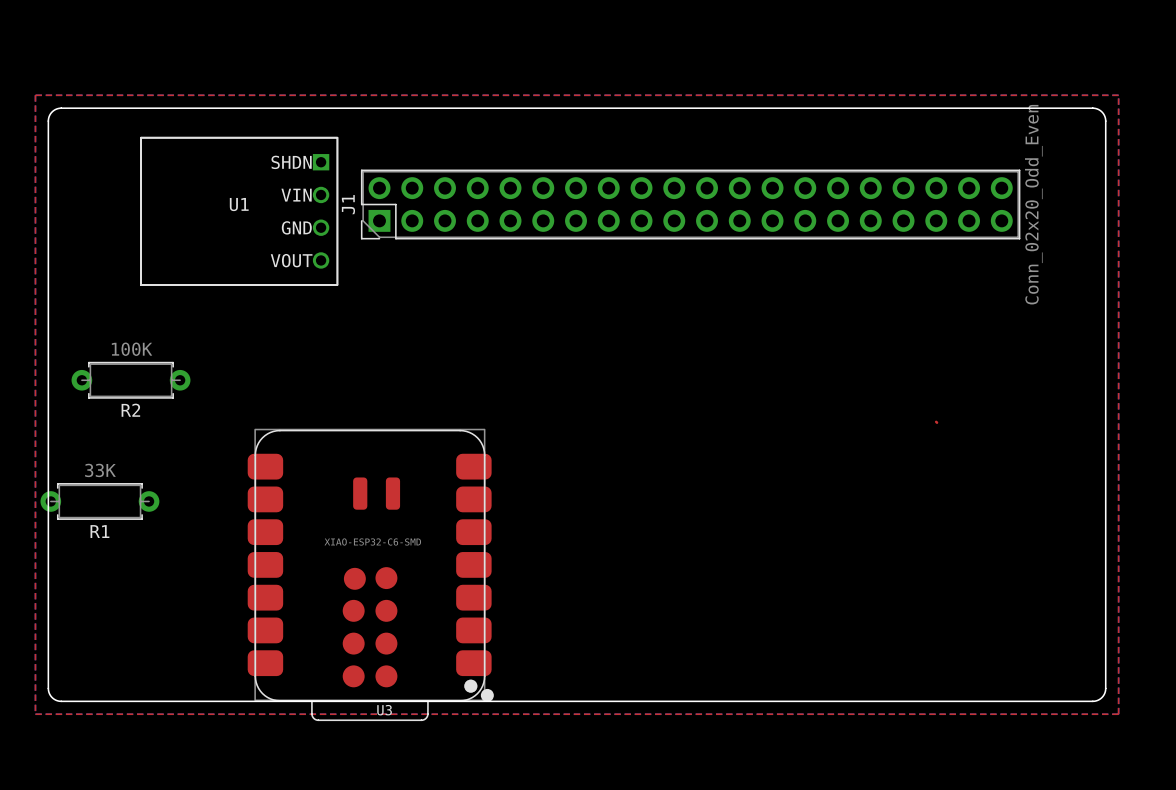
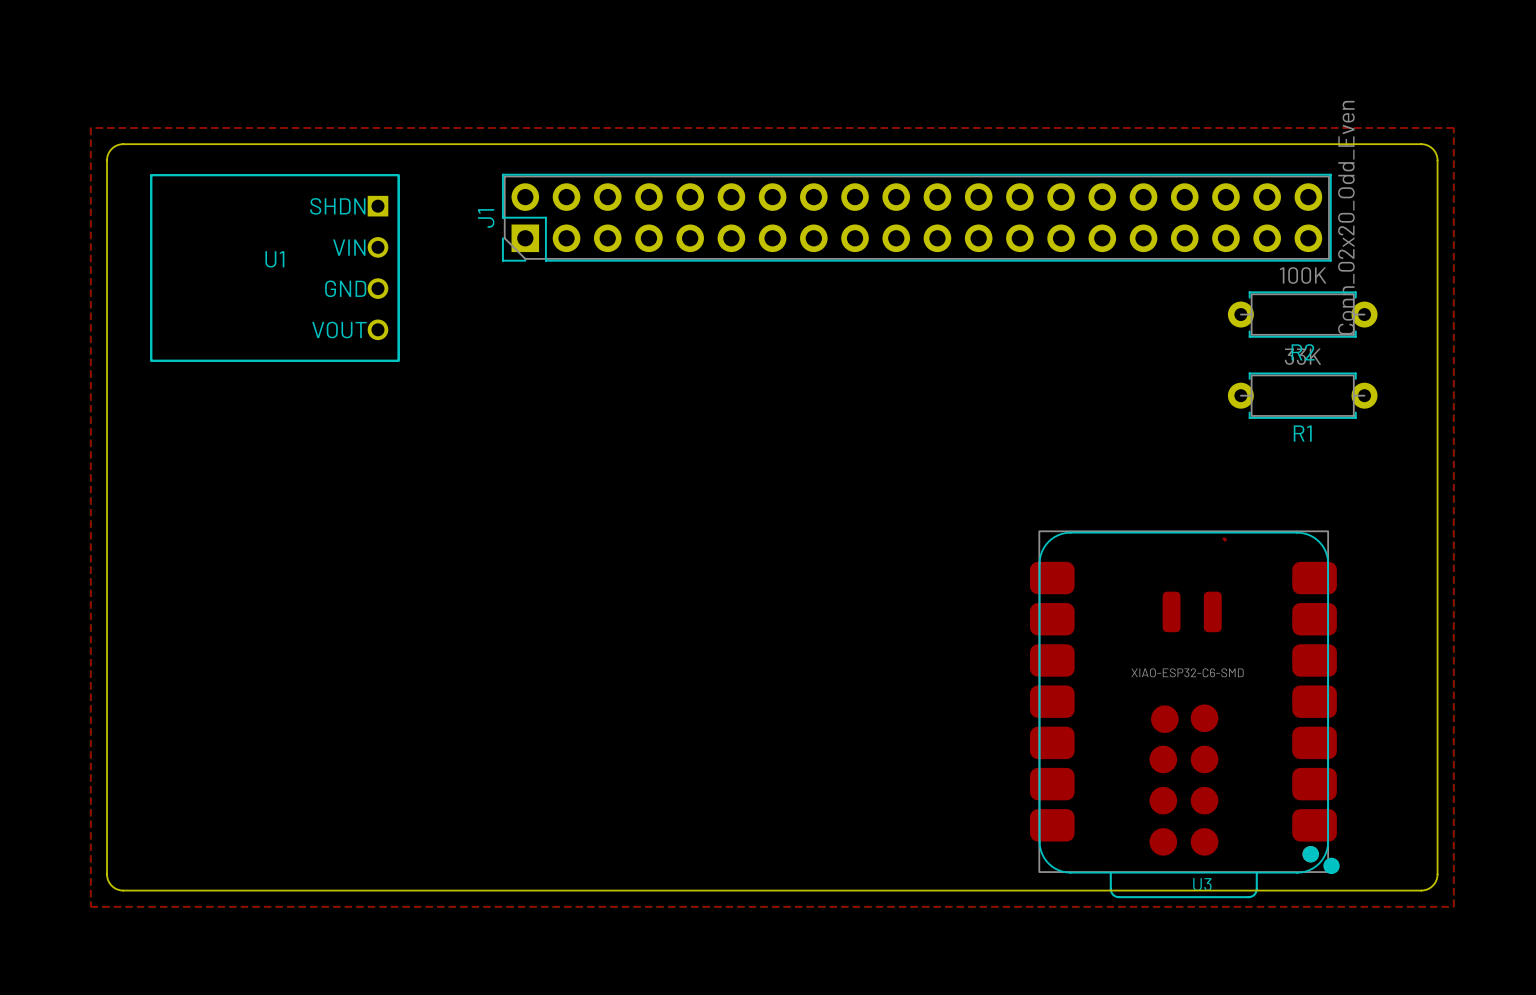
J1 position: (690, 204) -> (916, 217)
U1 position: (239, 211) -> (274, 267)
R2 position: (131, 380) -> (1302, 314)
R1 position: (99, 501) -> (1302, 395)
U3 position: (370, 574) -> (1184, 714)

